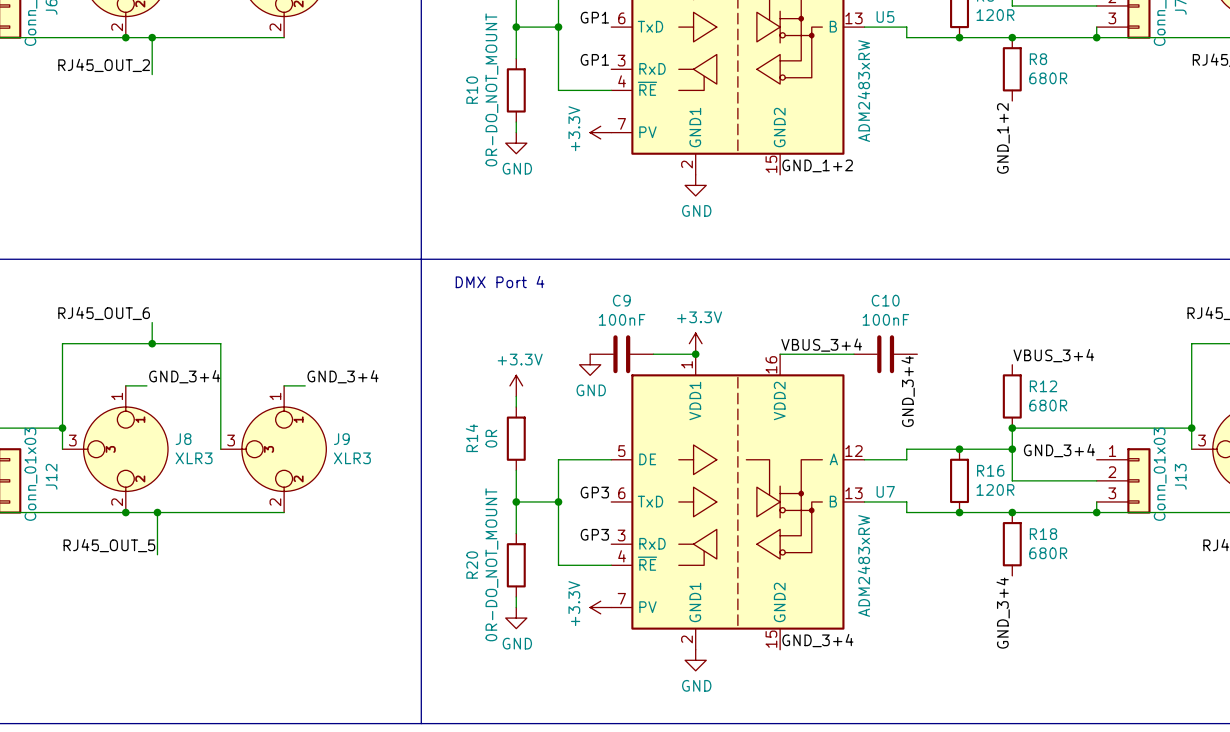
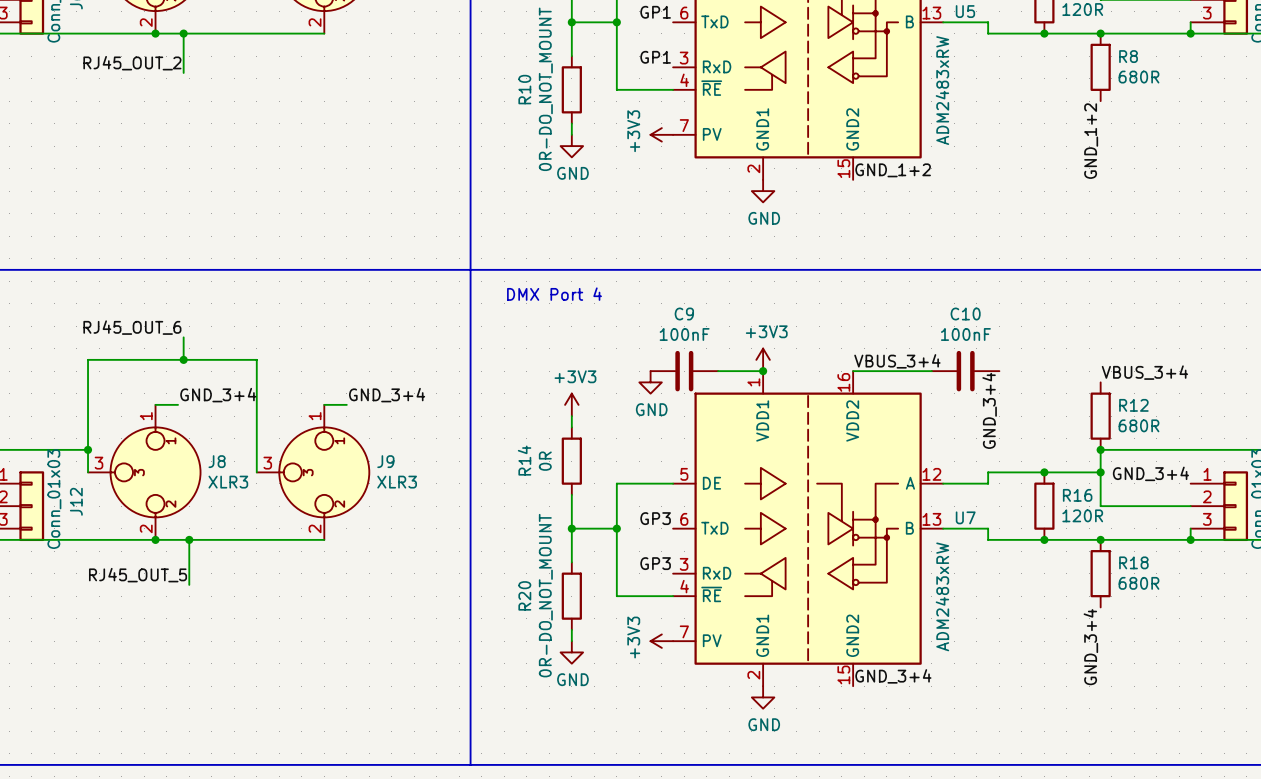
power symbol: +3.3V (600, 132) -> +3V3 (661, 134)
power symbol: +3.3V (695, 343) -> +3V3 (763, 359)
power symbol: +3.3V (516, 385) -> +3V3 (571, 404)
power symbol: +3.3V (600, 607) -> +3V3 (661, 641)

